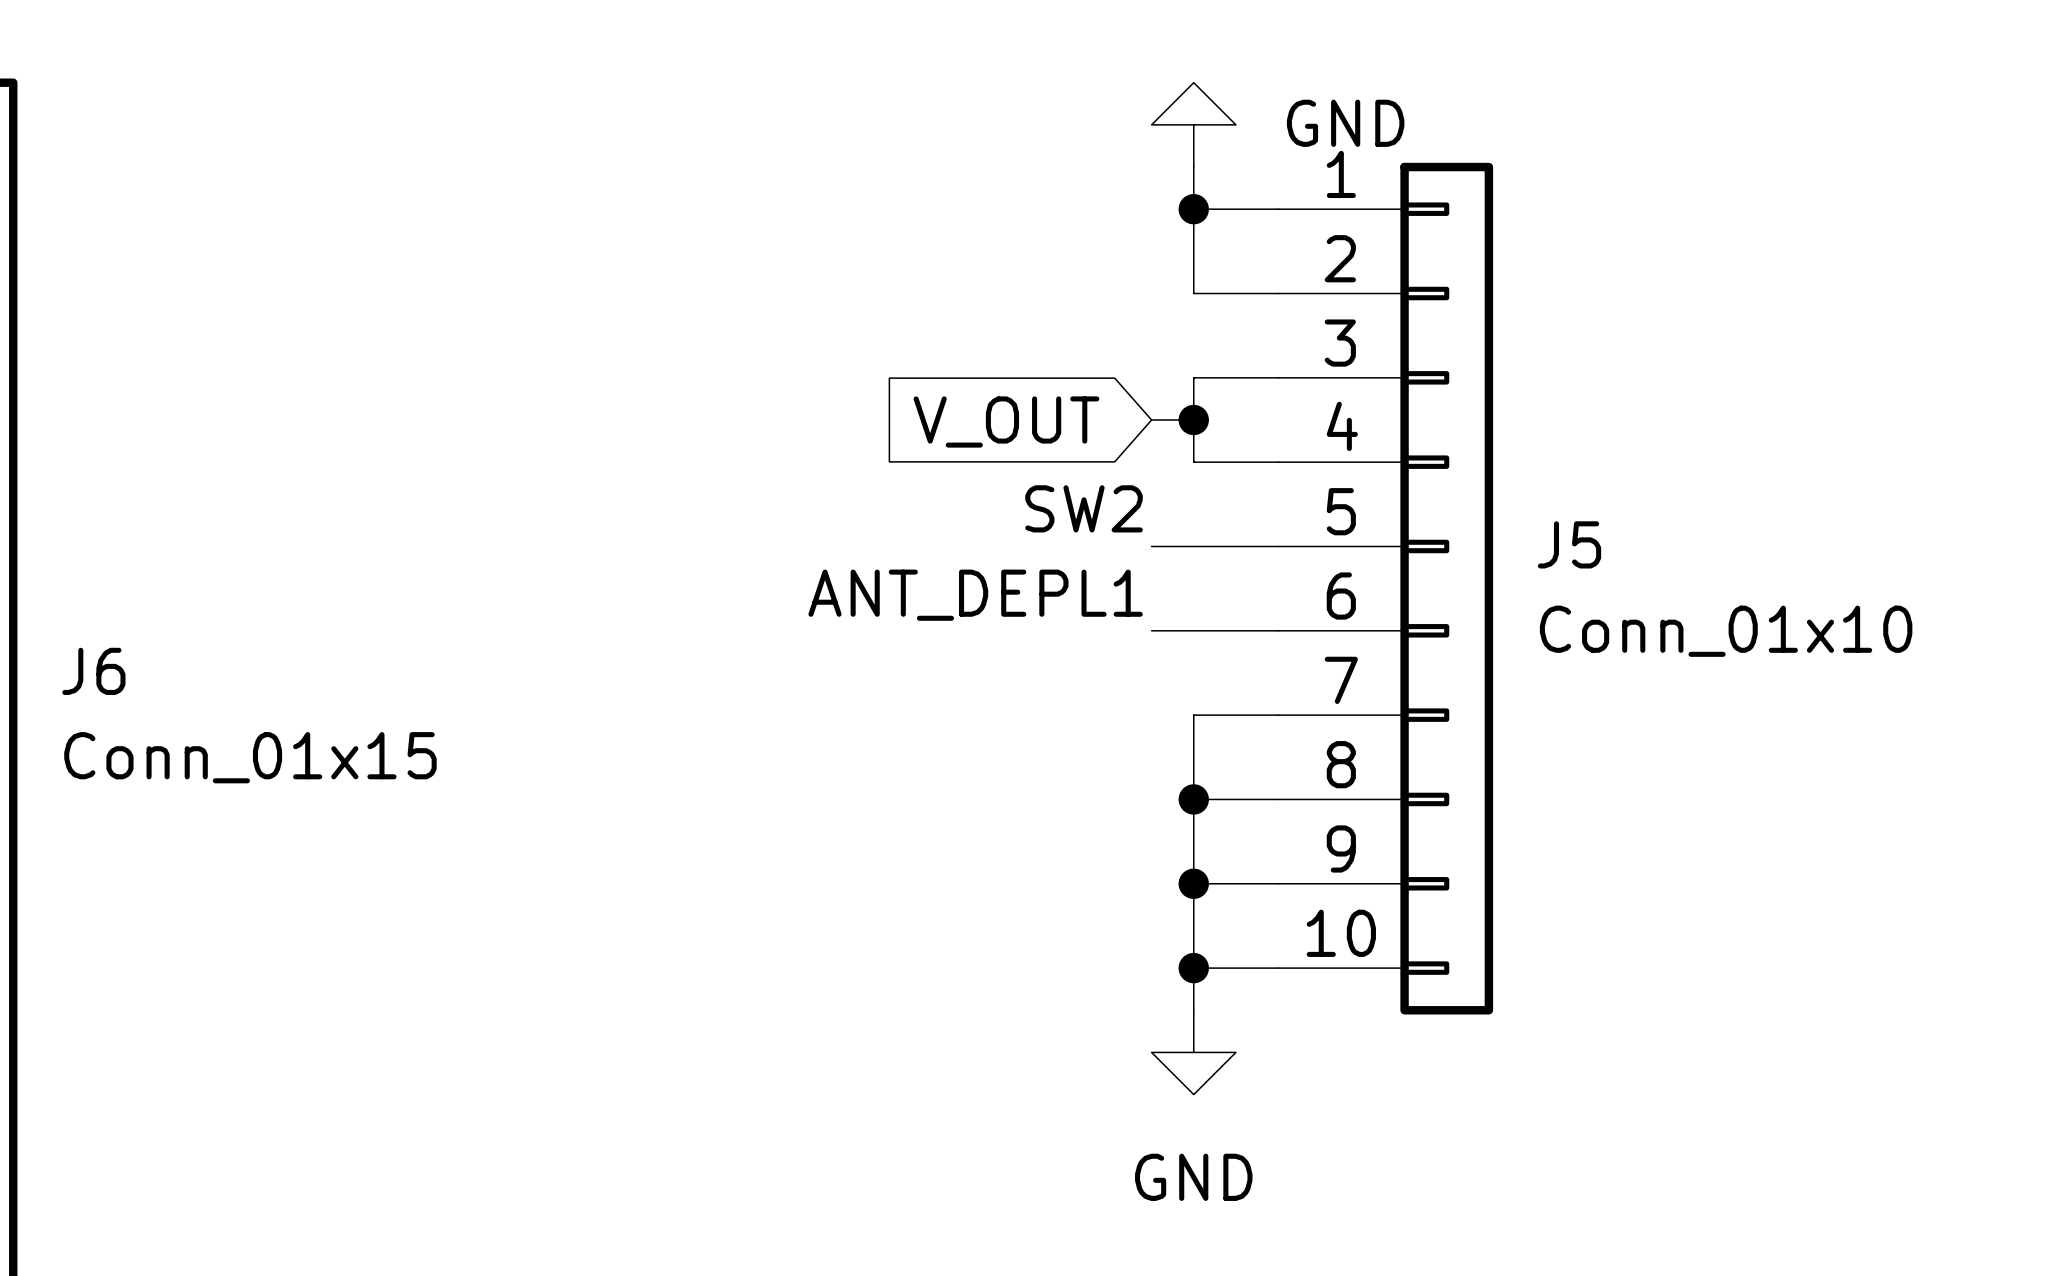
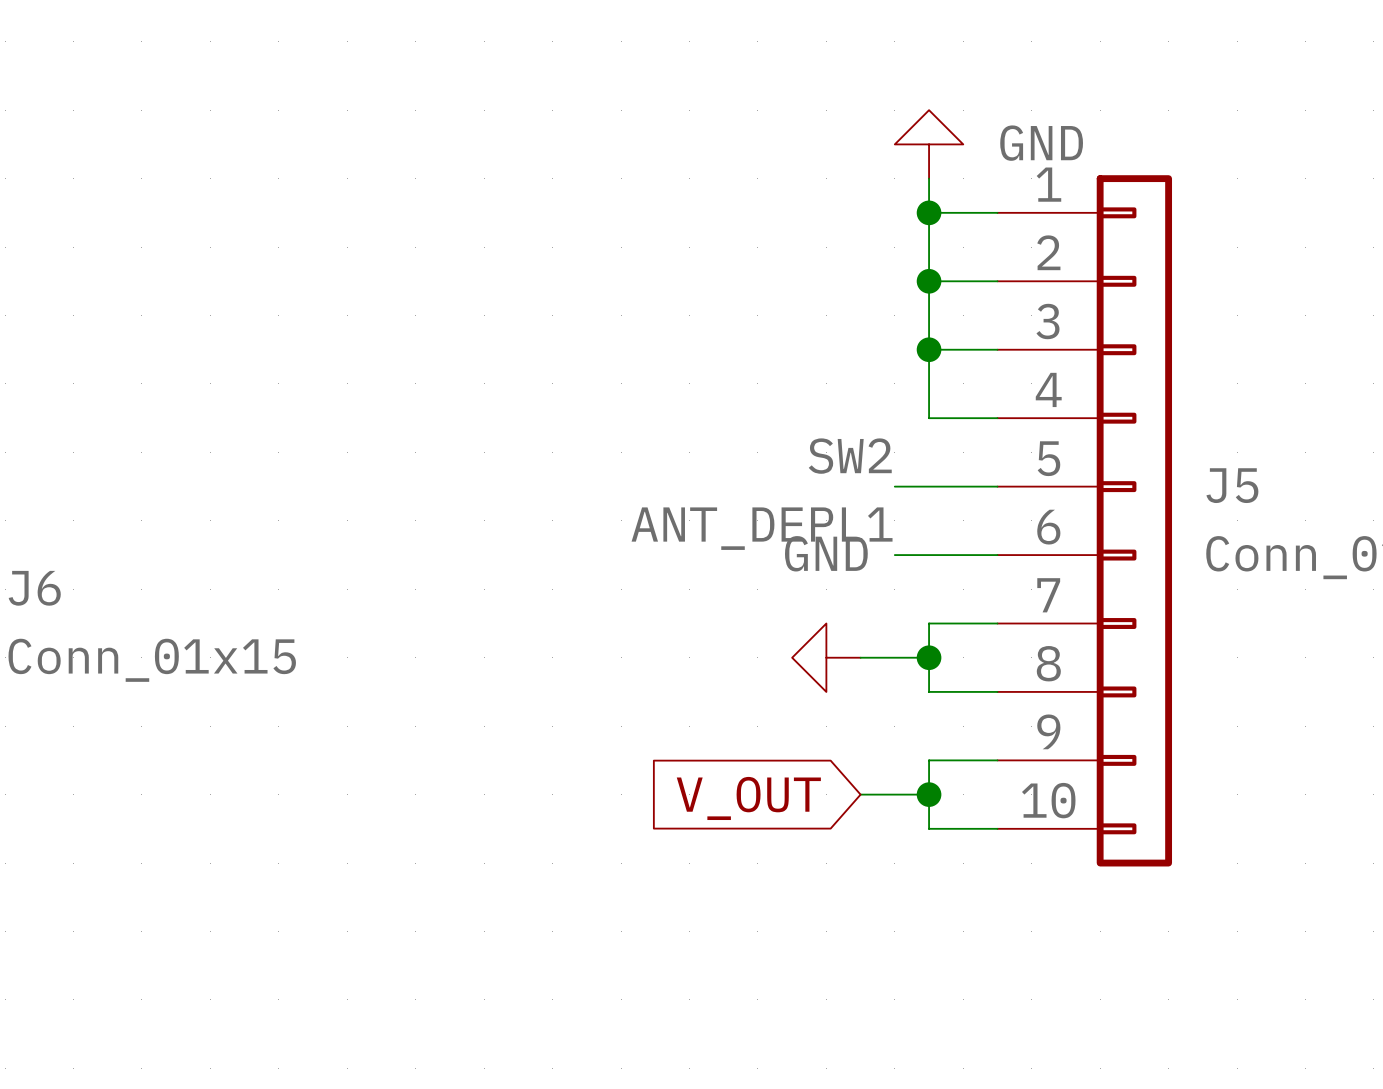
junction: none -> (929, 281)
wire: (1151, 420) (1193, 420) -> none
junction position: (1193, 420) -> (929, 349)
global label position: V_OUT (1006, 422) -> V_OUT (748, 798)
wire: none -> (860, 657) (929, 657)
wire: (1193, 799) (1193, 883) -> (929, 281) (929, 349)
junction position: (1193, 799) -> (929, 657)
junction: (1193, 883) -> none
wire: none -> (860, 794) (929, 794)
junction: none -> (929, 794)
wire: (1193, 968) (1193, 1010) -> none
junction: (1193, 968) -> none
power symbol rotation: 0° (1193, 1052) -> 90° clockwise (826, 657)
power symbol position: GND (1193, 1052) -> GND (826, 657)
power symbol text position: GND (1193, 1177) -> GND (826, 553)

